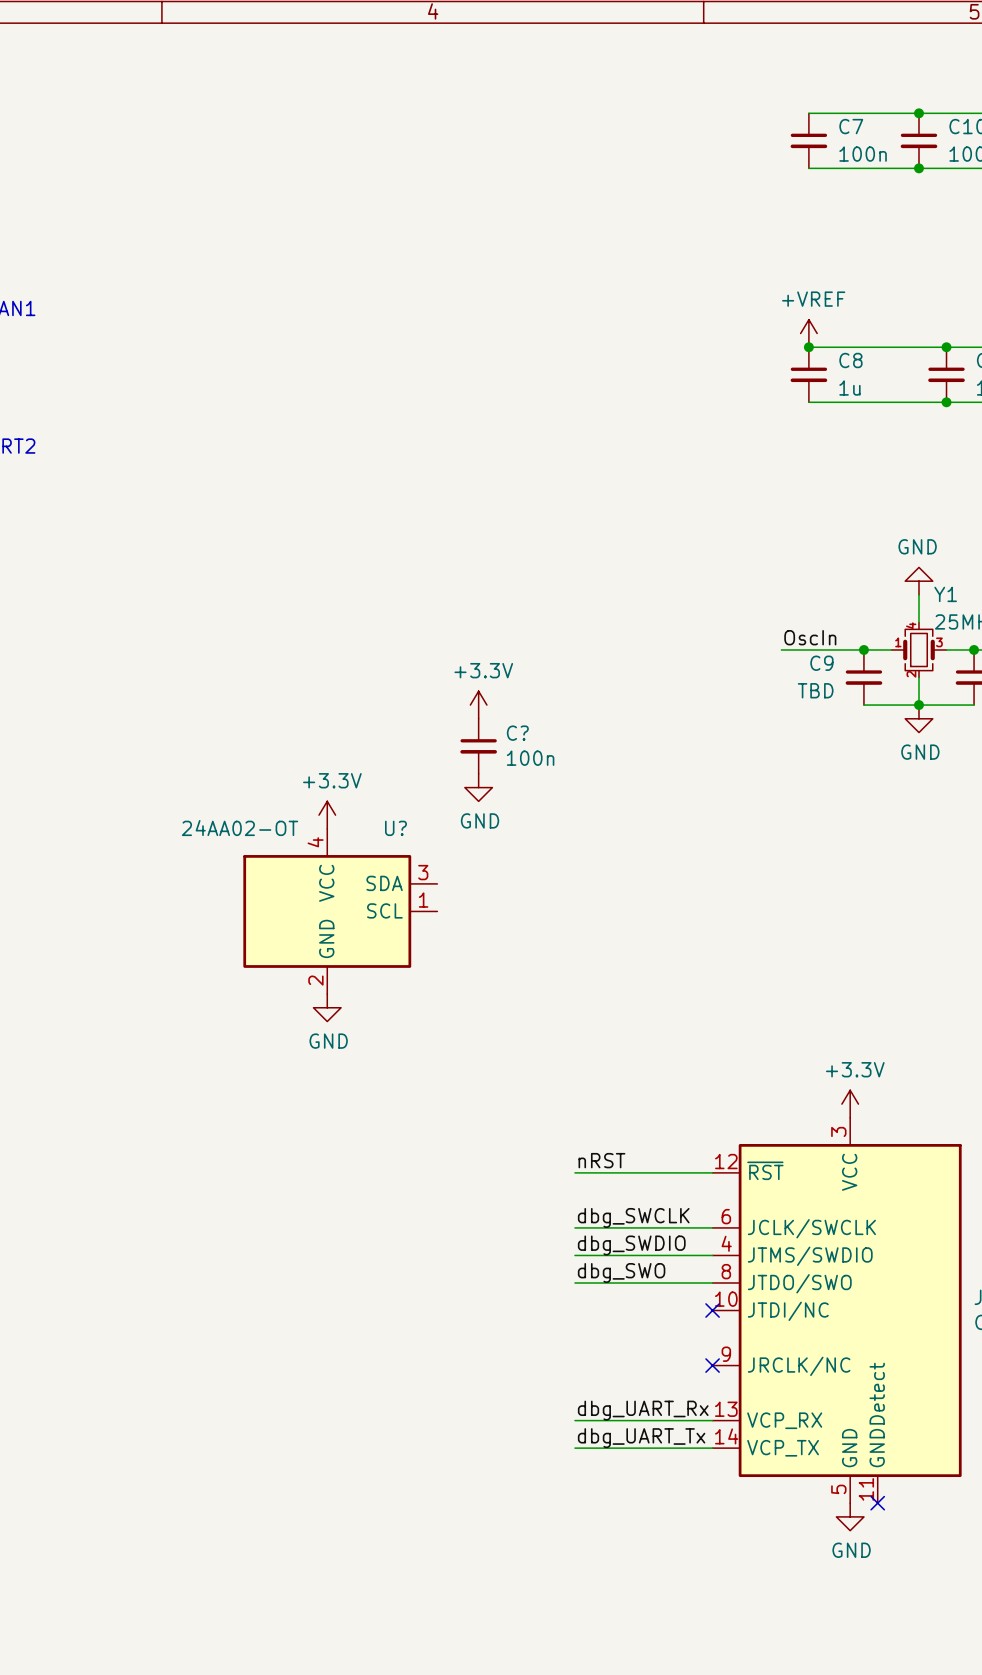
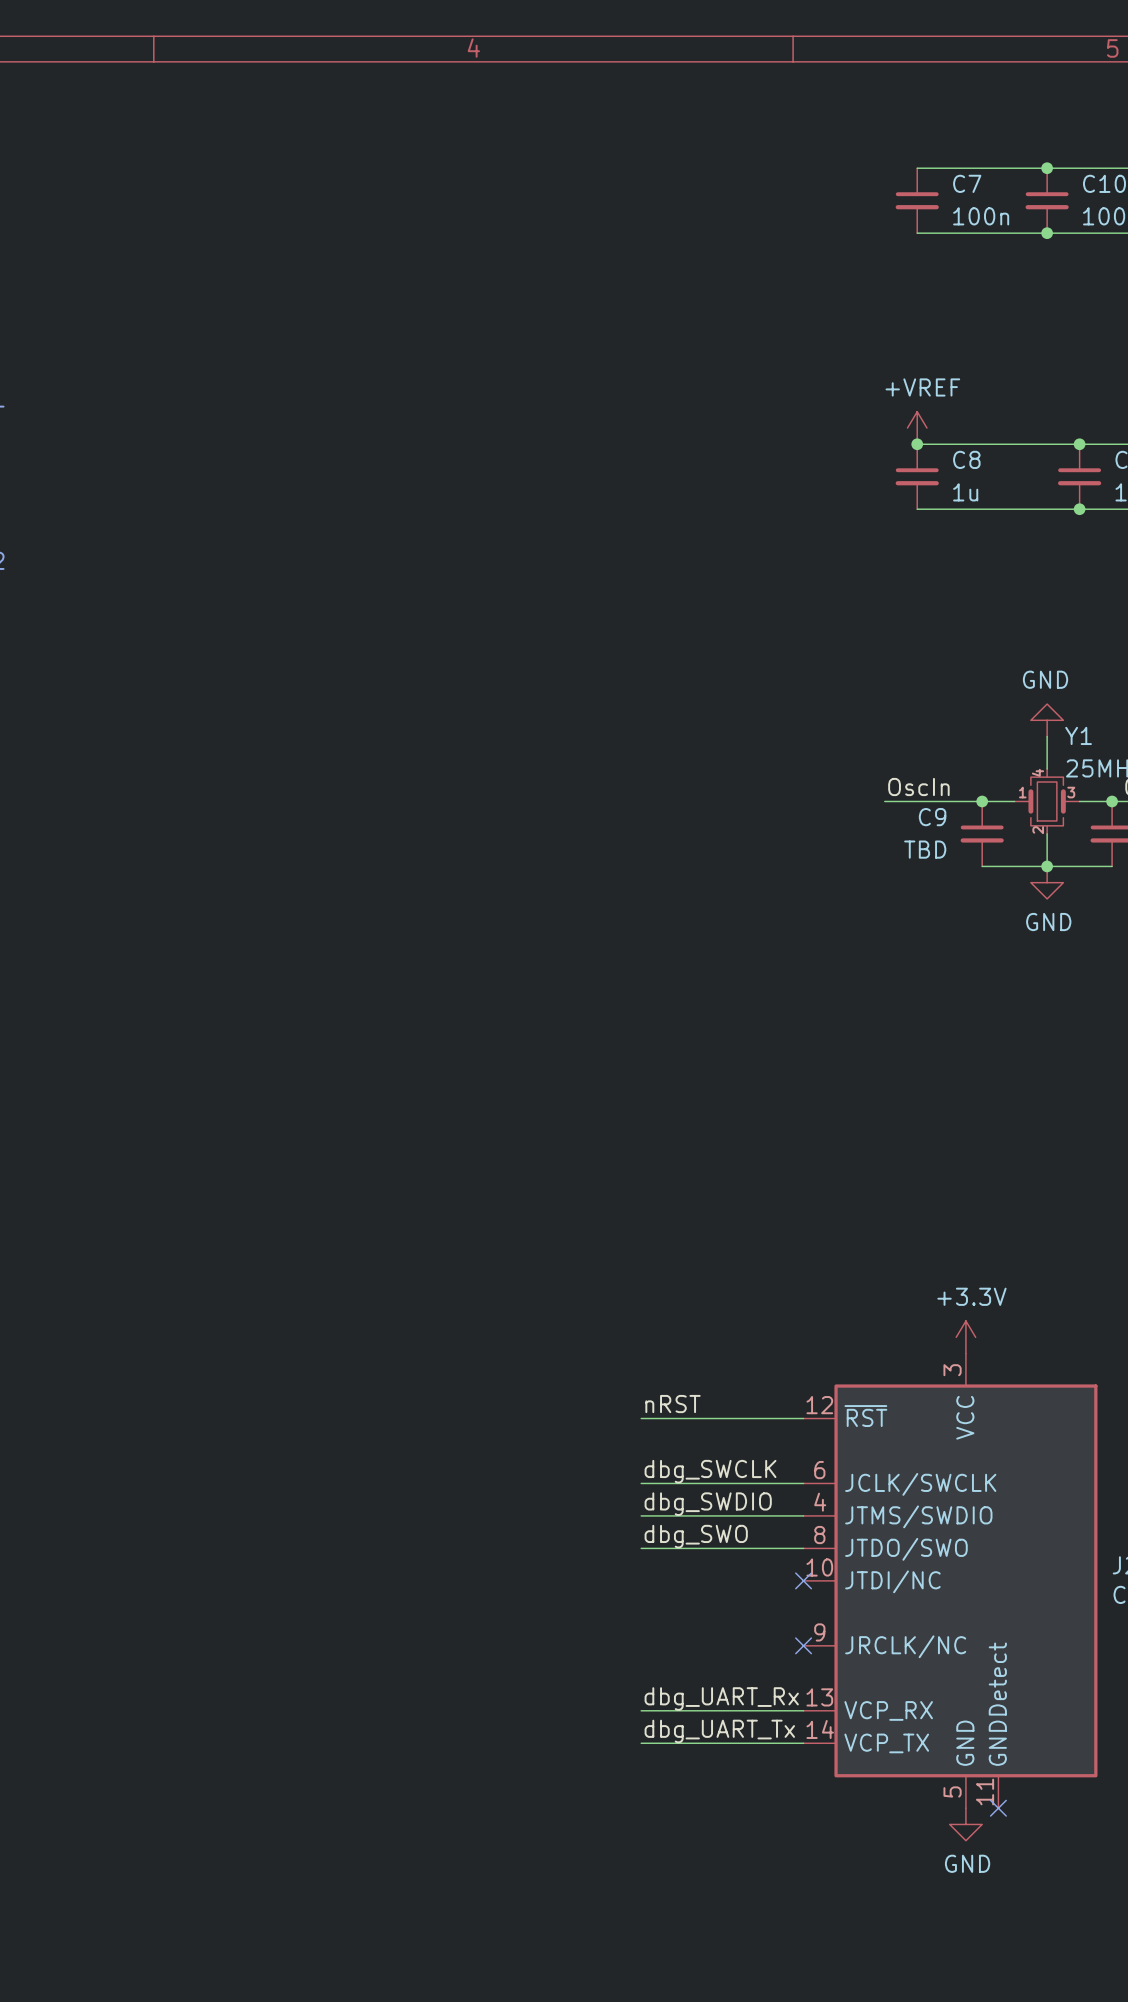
power symbol: +3.3V (478, 705) -> none
C?: 100n (478, 746) -> none
power symbol: GND (478, 787) -> none
power symbol: +3.3V (327, 815) -> none
U?: 24AA02-OT (340, 911) -> none
power symbol: GND (327, 1007) -> none

